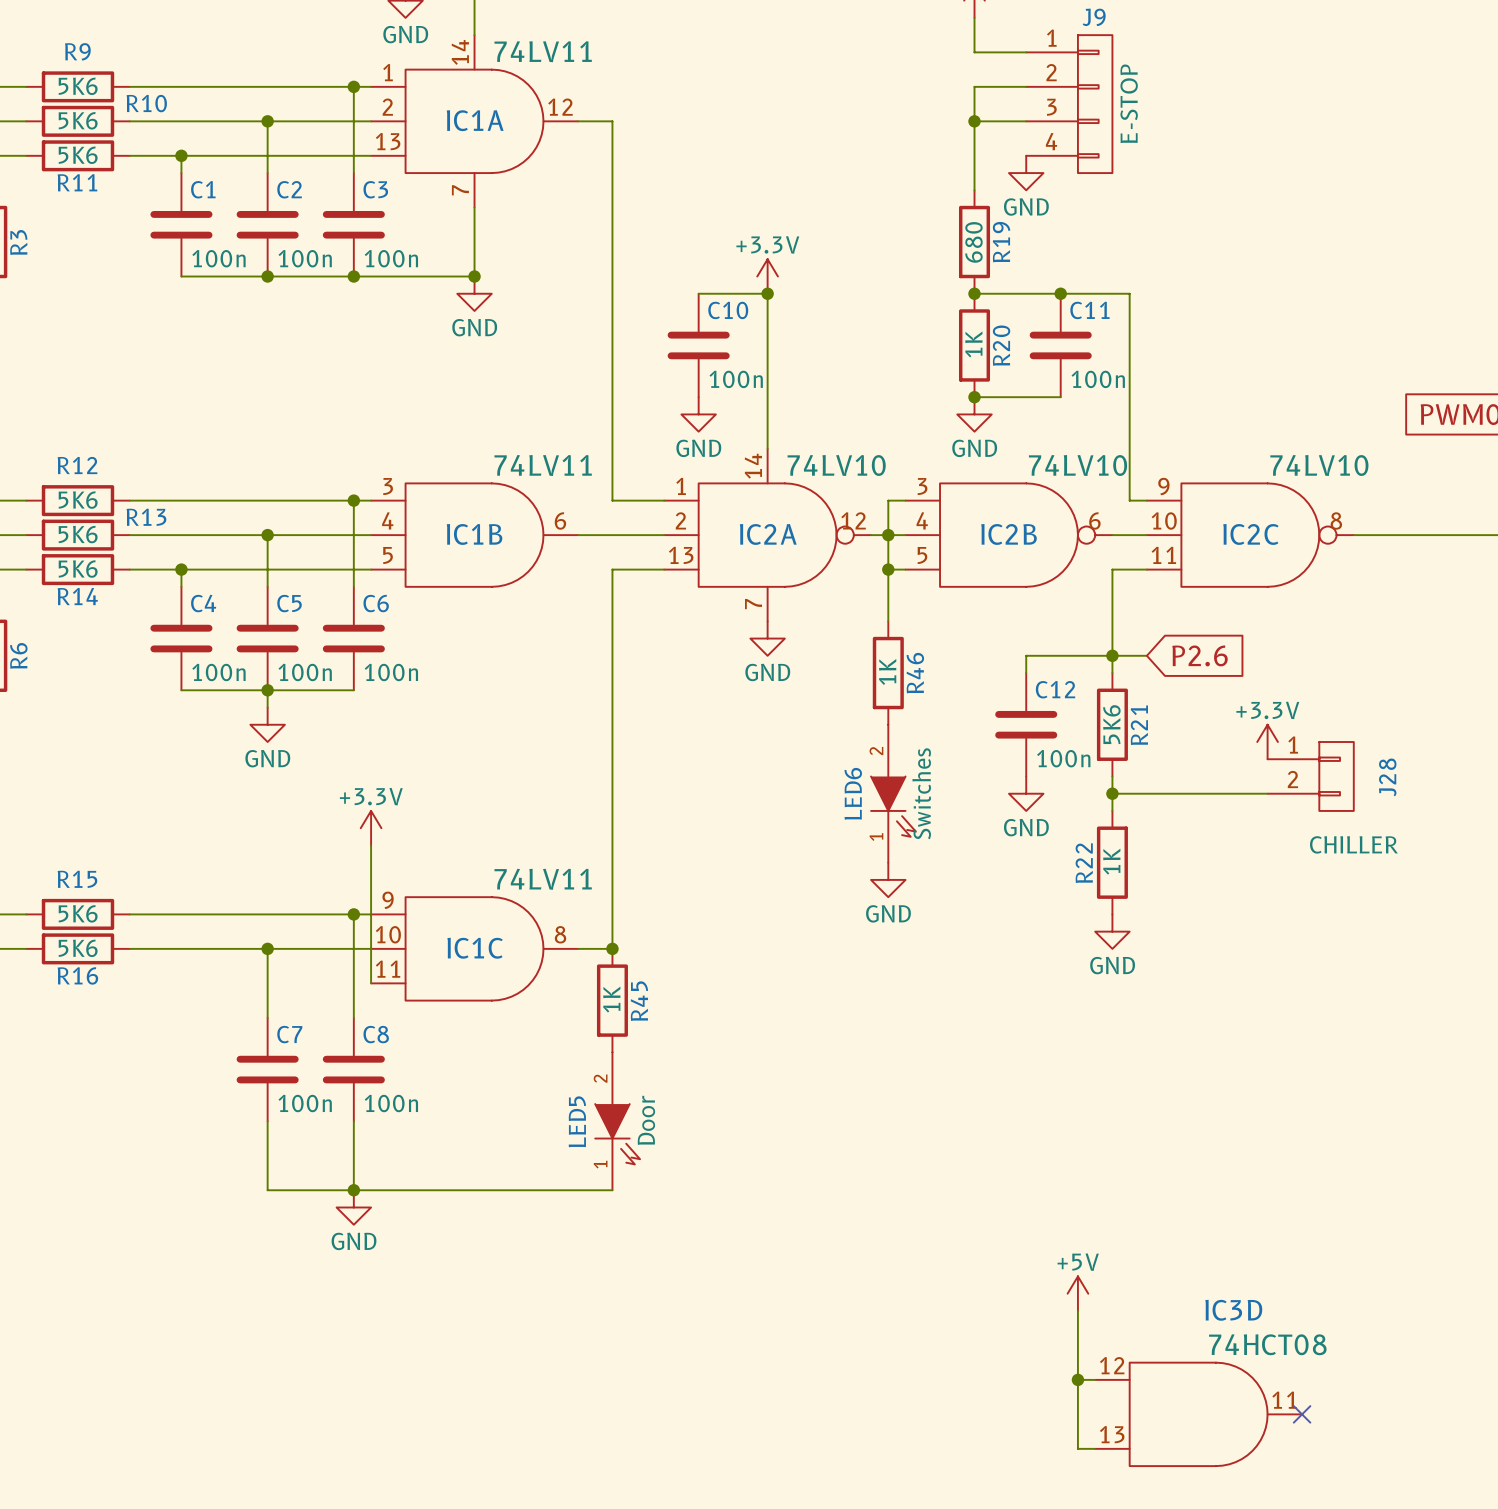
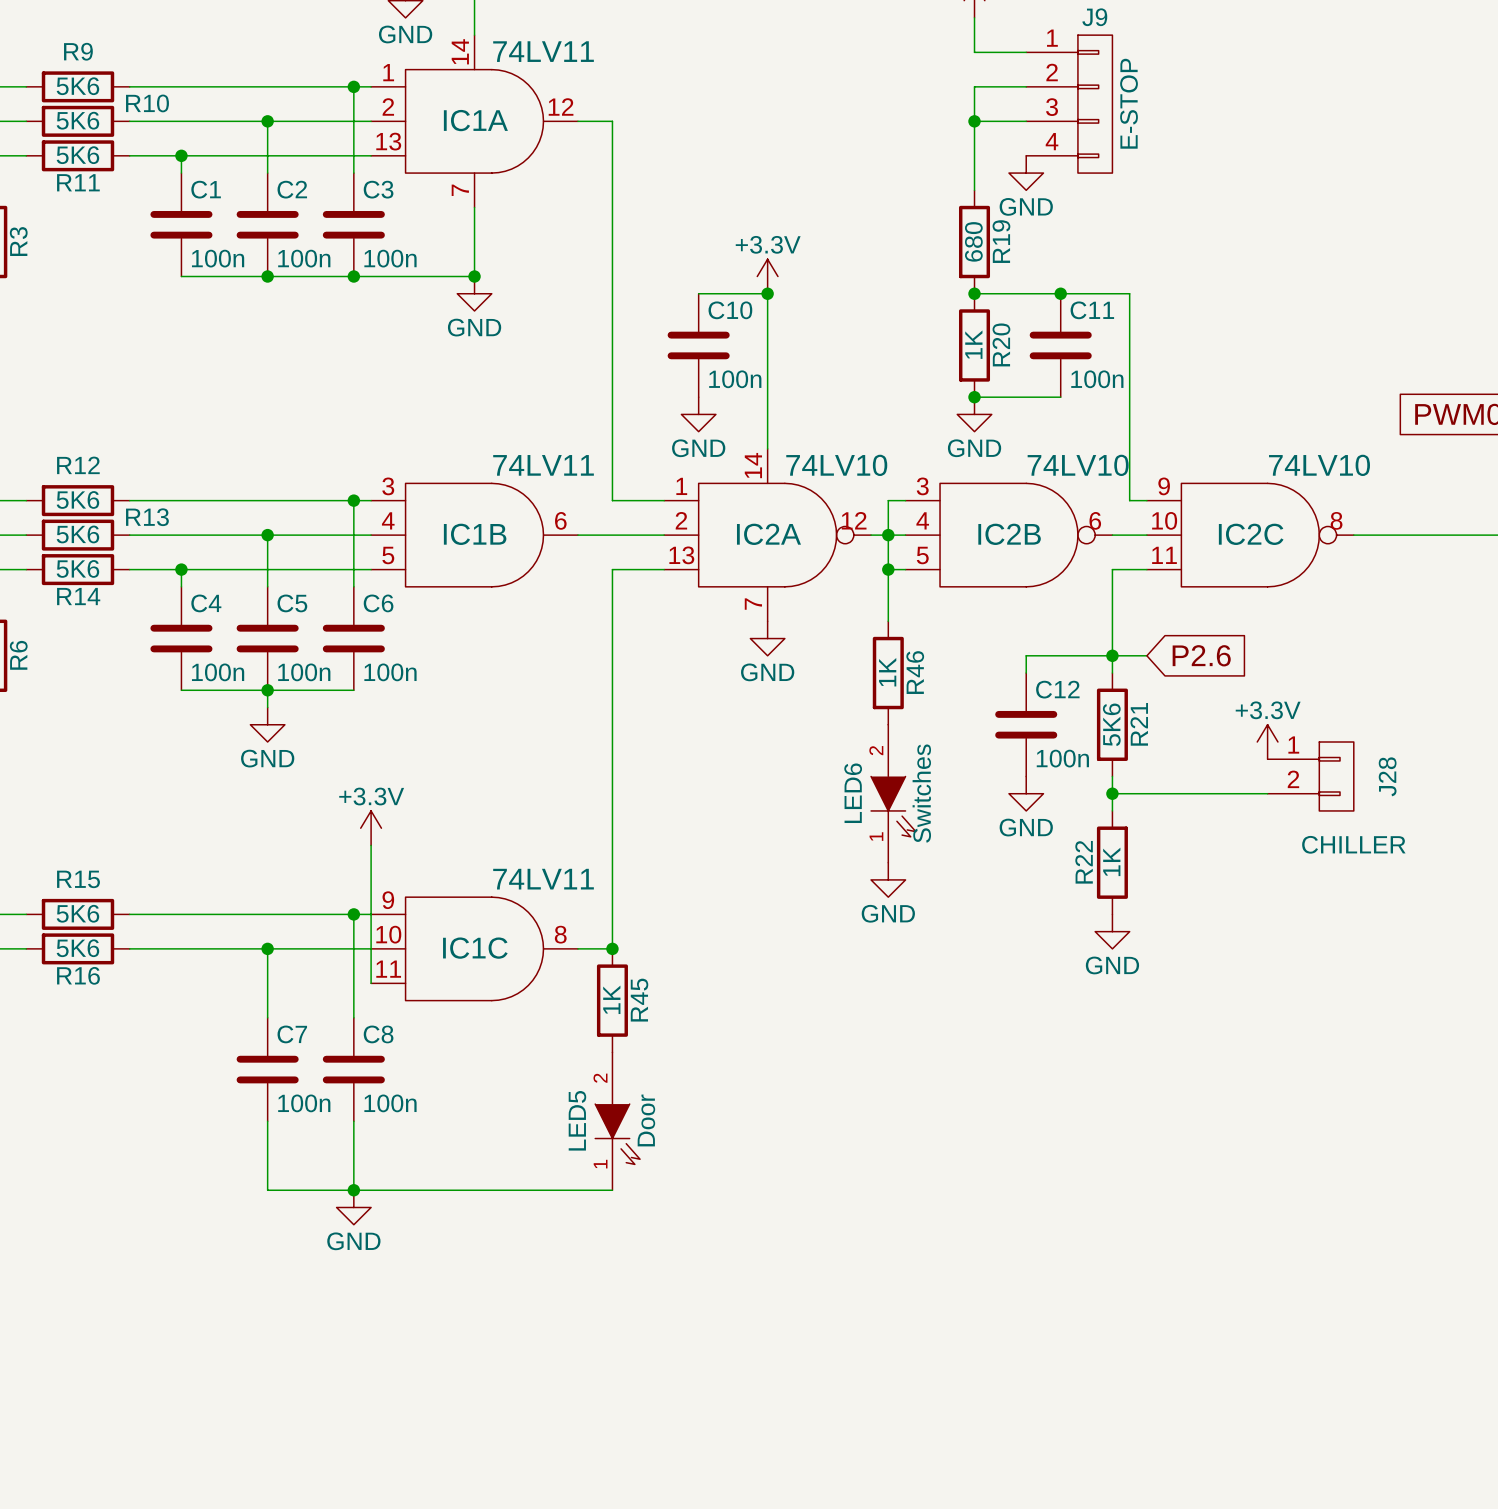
power symbol: +5V (1077, 1293) -> none
wire: (1077, 1310) (1077, 1448) (1095, 1448) -> none
wire: (1077, 1379) (1095, 1379) -> none
junction: (1077, 1379) -> none
IC3D: 74HCT08 (1198, 1414) -> none
no-connect mark: (1302, 1414) -> none

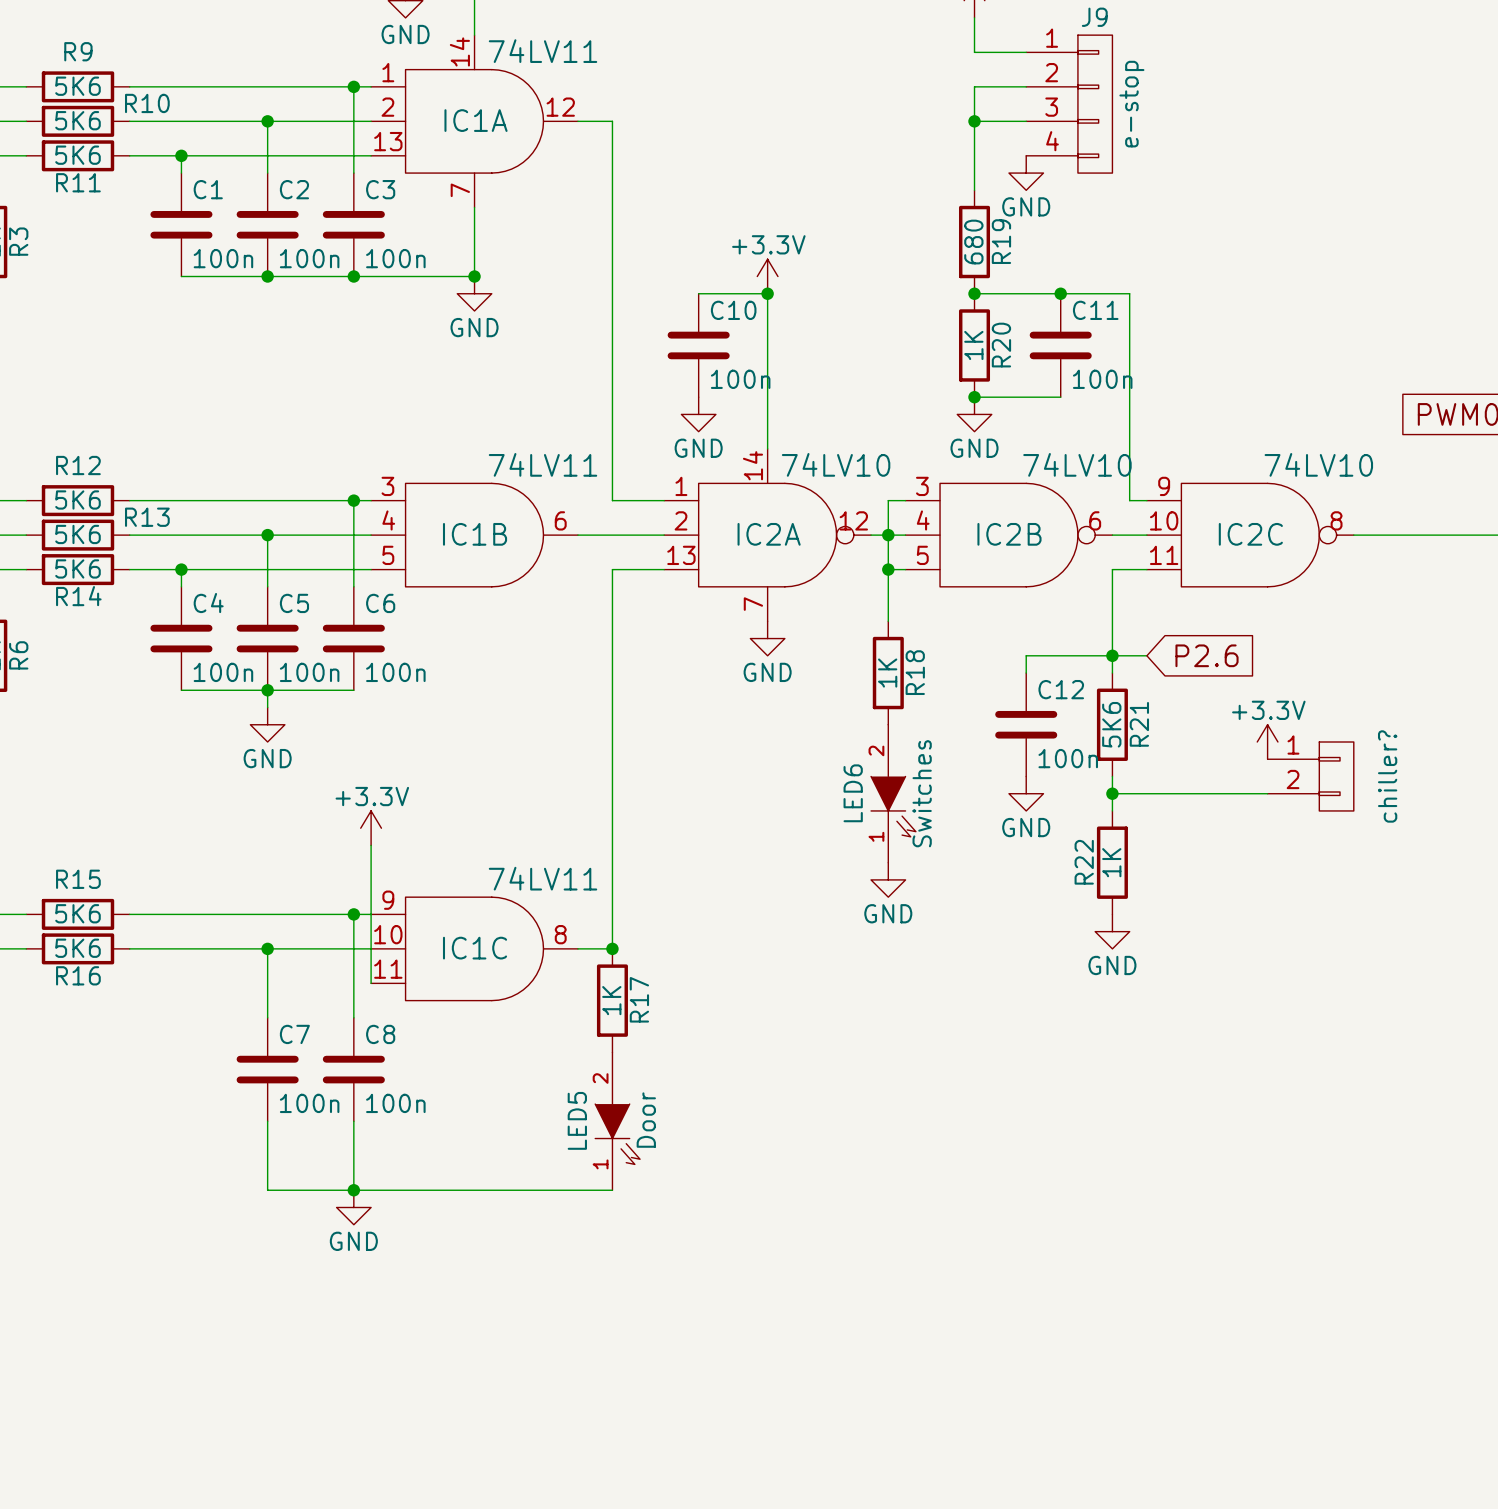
J9 value: E-STOP (1129, 103) -> e-stop (1131, 104)
R46 name: R46 (915, 672) -> R18 (915, 672)
J28 name: J28 (1387, 776) -> chiller? (1387, 776)
J28 value: CHILLER (1353, 844) -> none
R45 name: R45 (639, 1000) -> R17 (639, 999)

